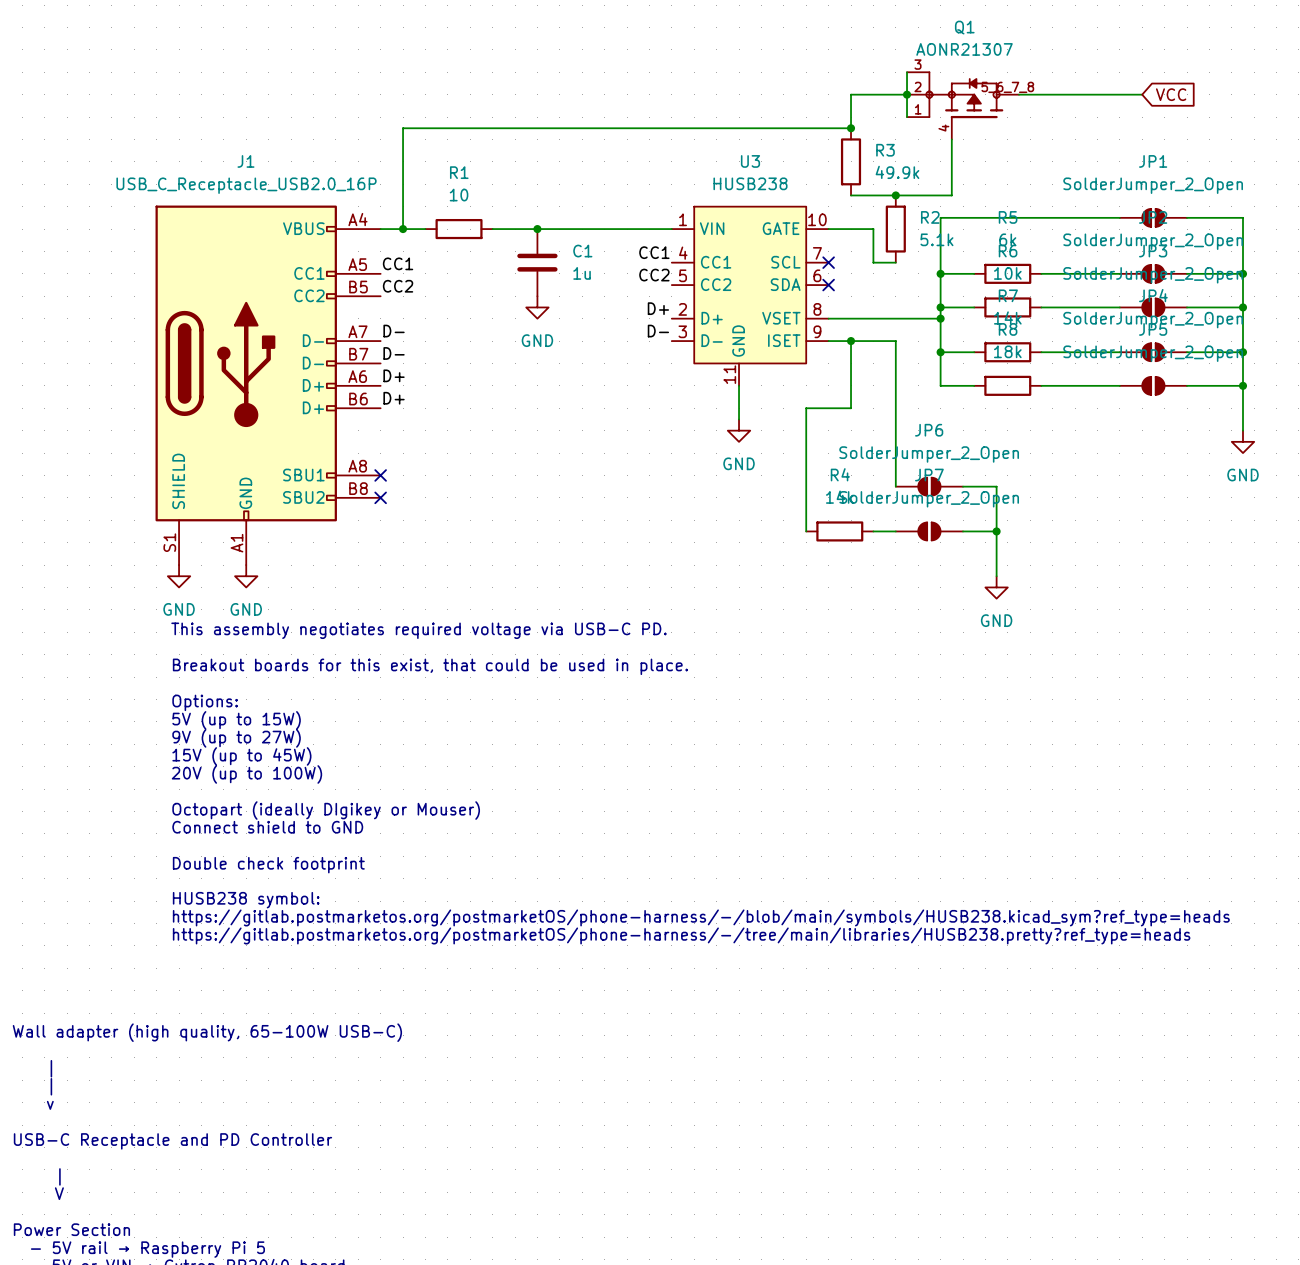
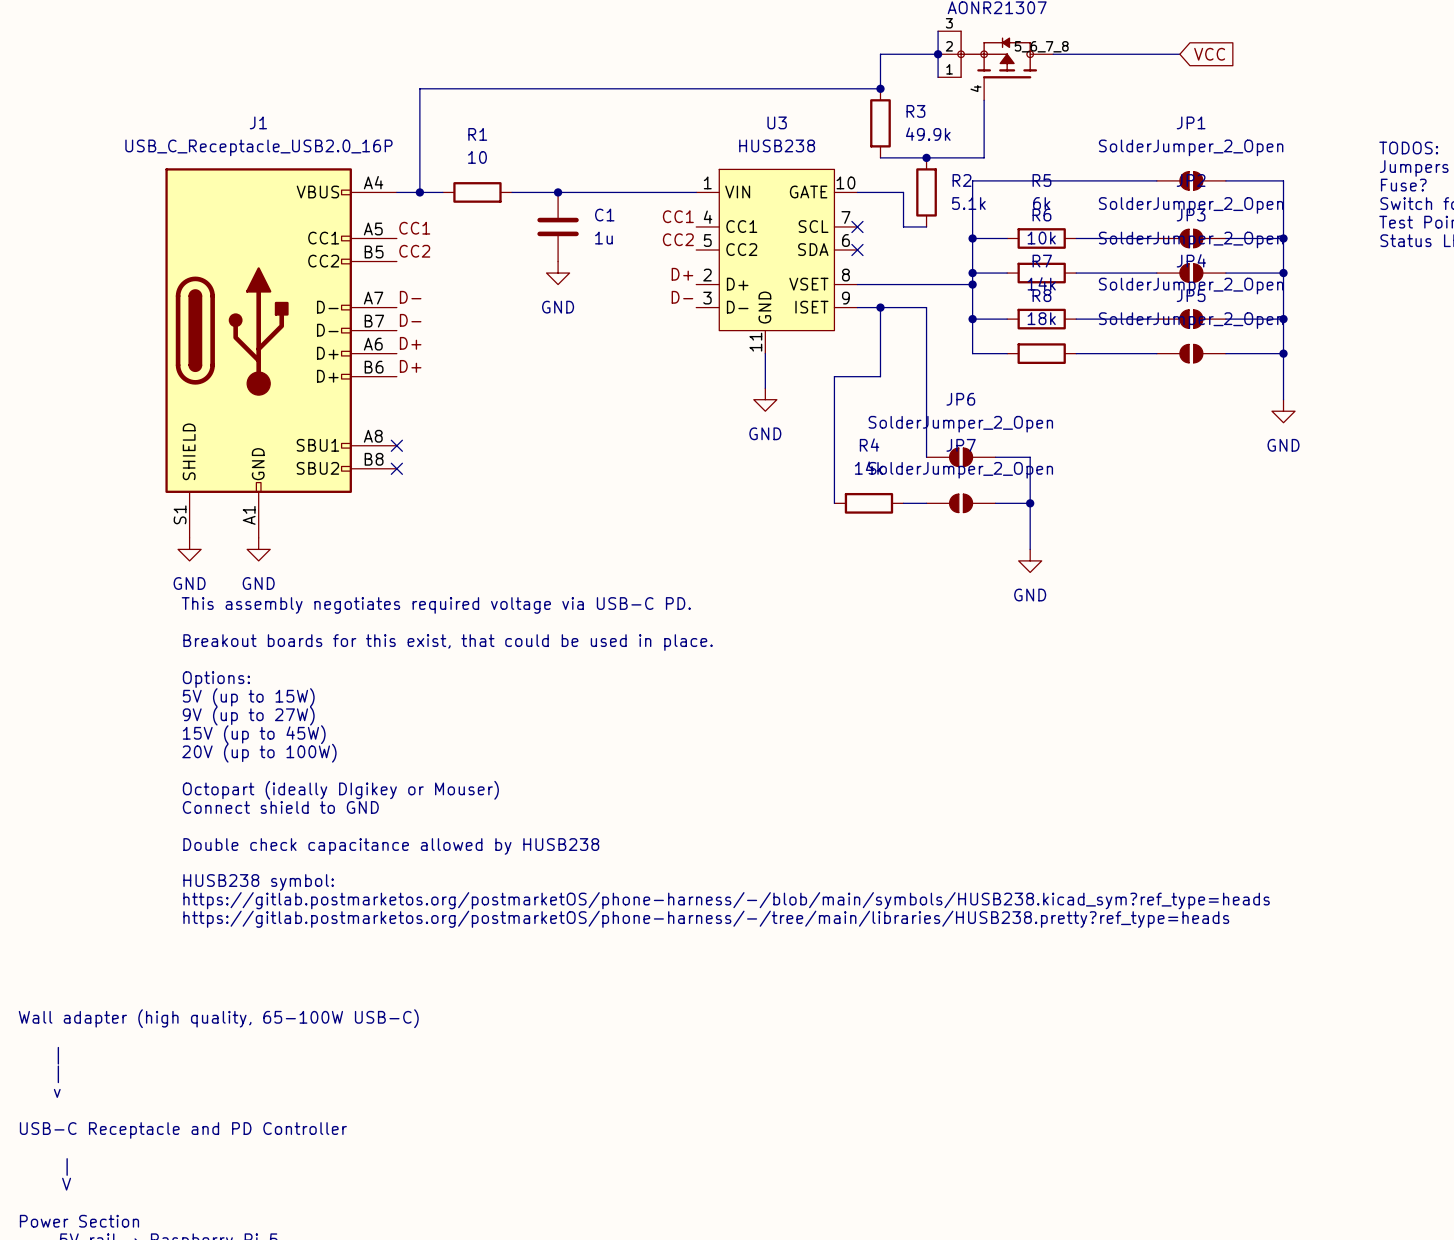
text: Double check footprint (268, 865) -> Double check capacitance allowed by HUSB238 (391, 846)

